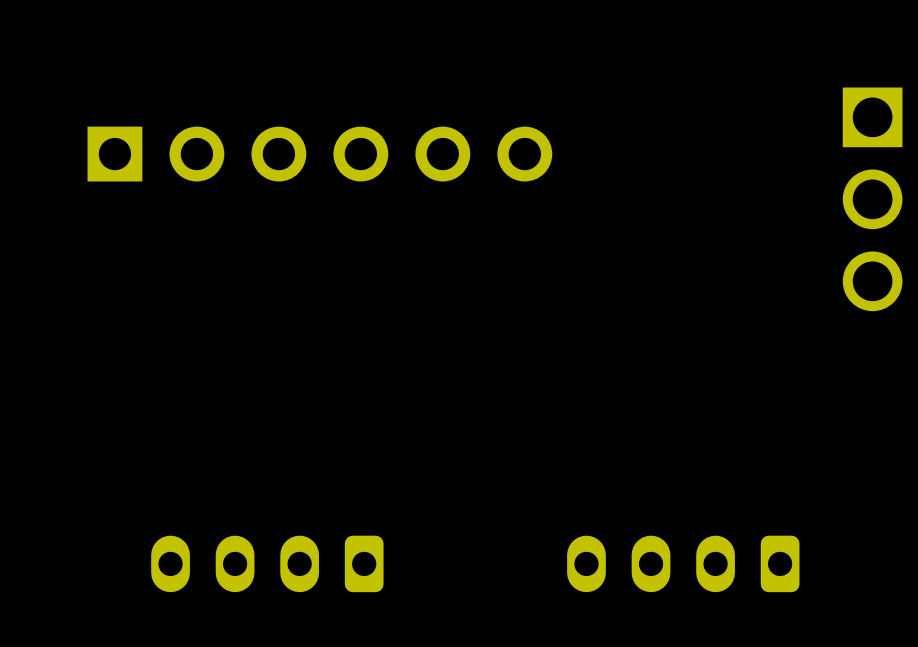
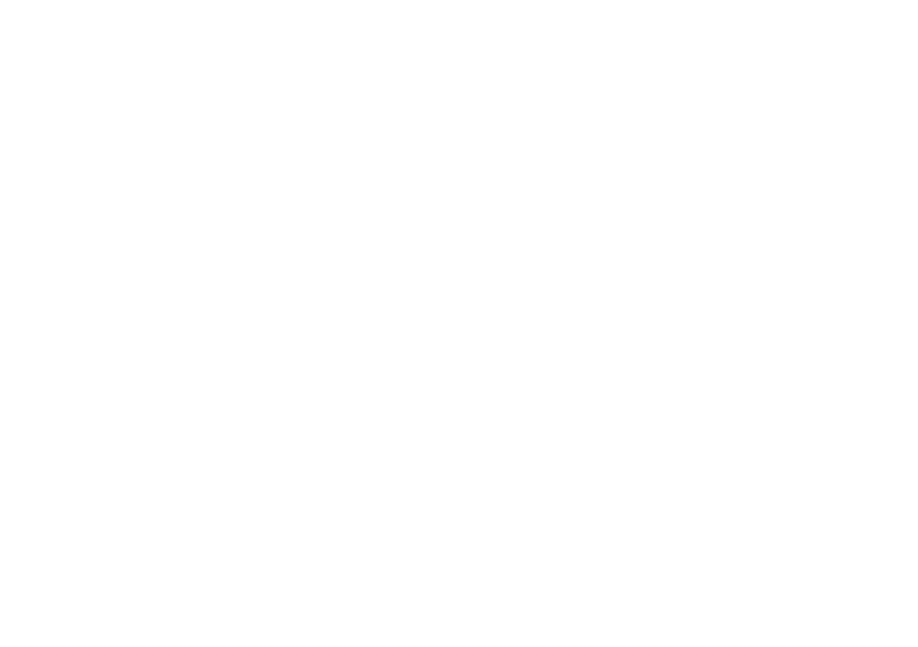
part: (319, 154) -> none
part: (872, 199) -> none
part: (267, 563) -> none
part: (683, 563) -> none

